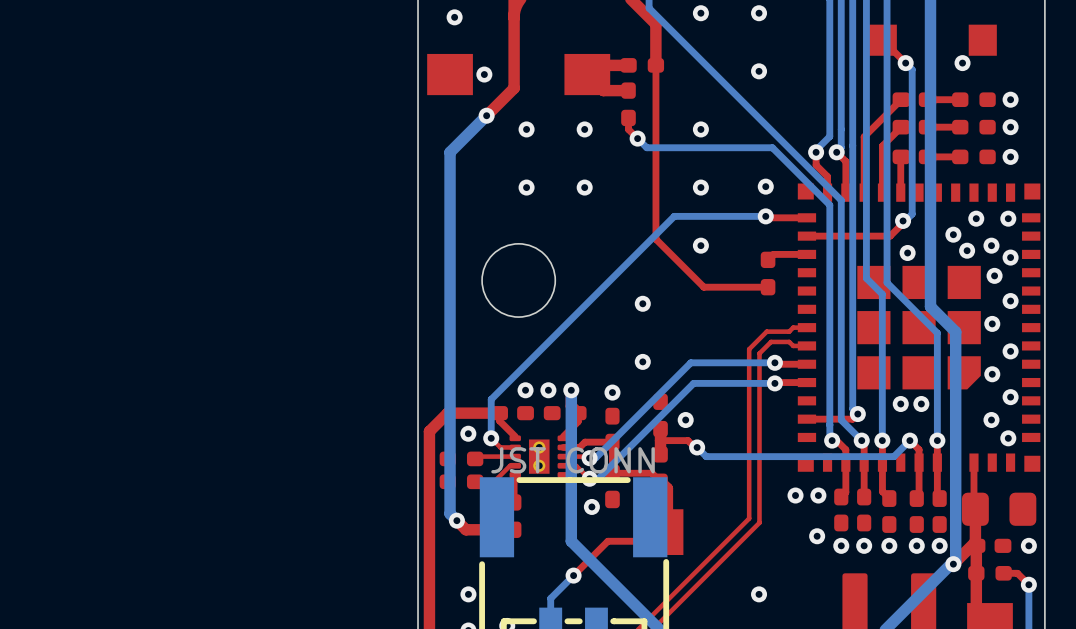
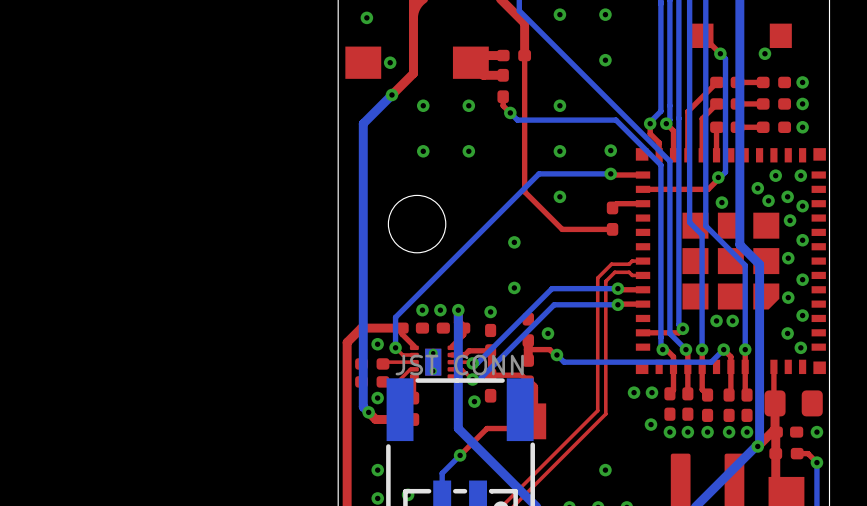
part footprint: [509, 435, 570, 478] -> [409, 345, 457, 379]
via: none -> (377, 398)

